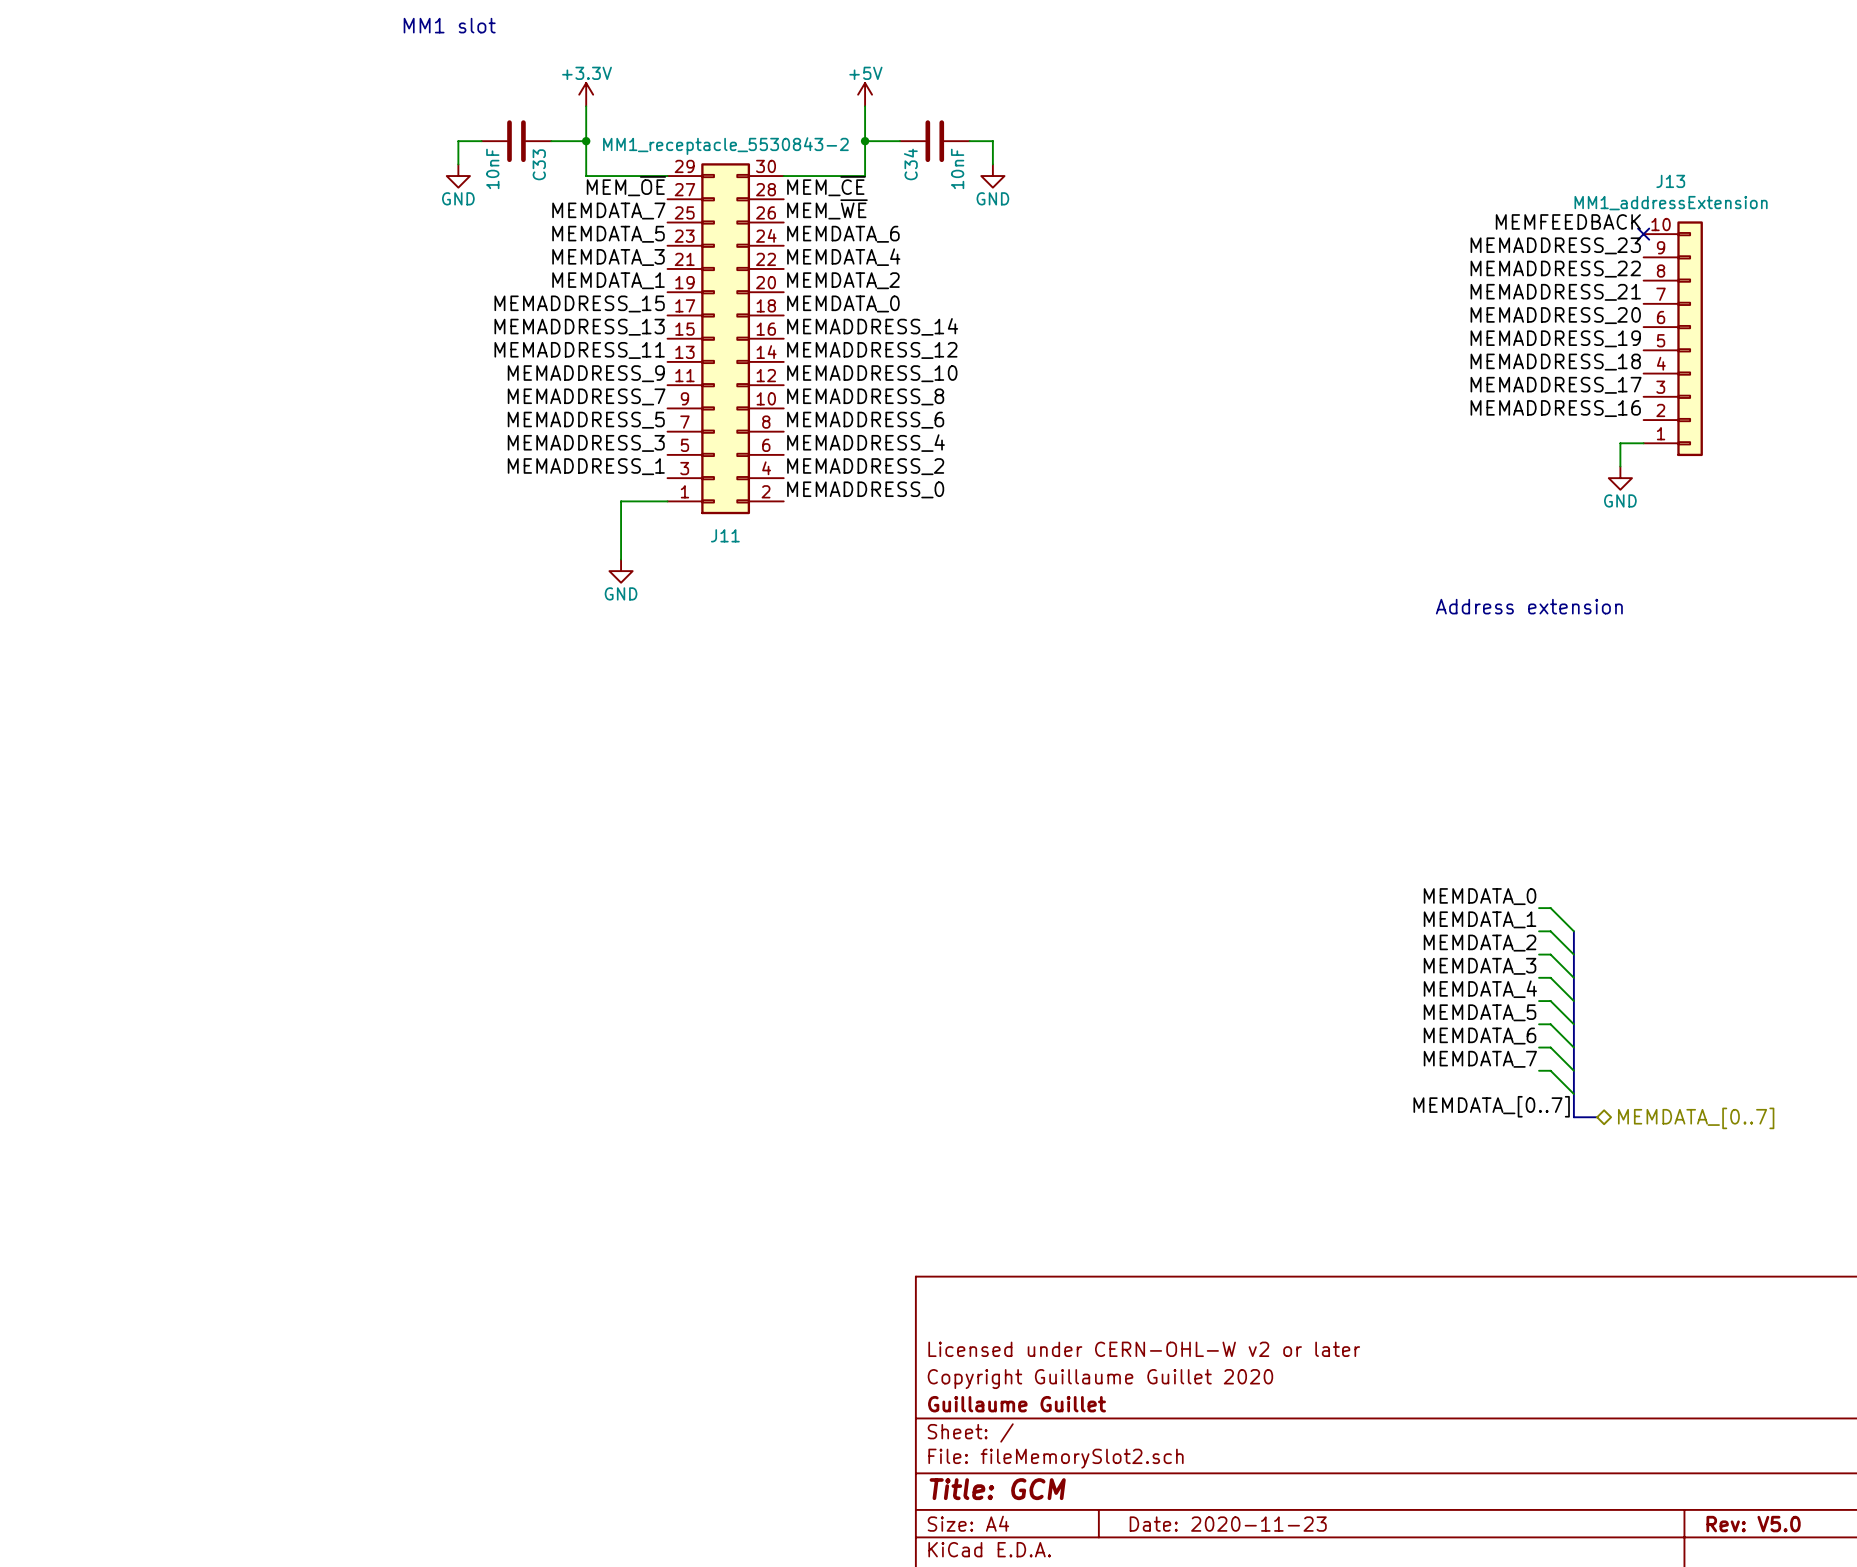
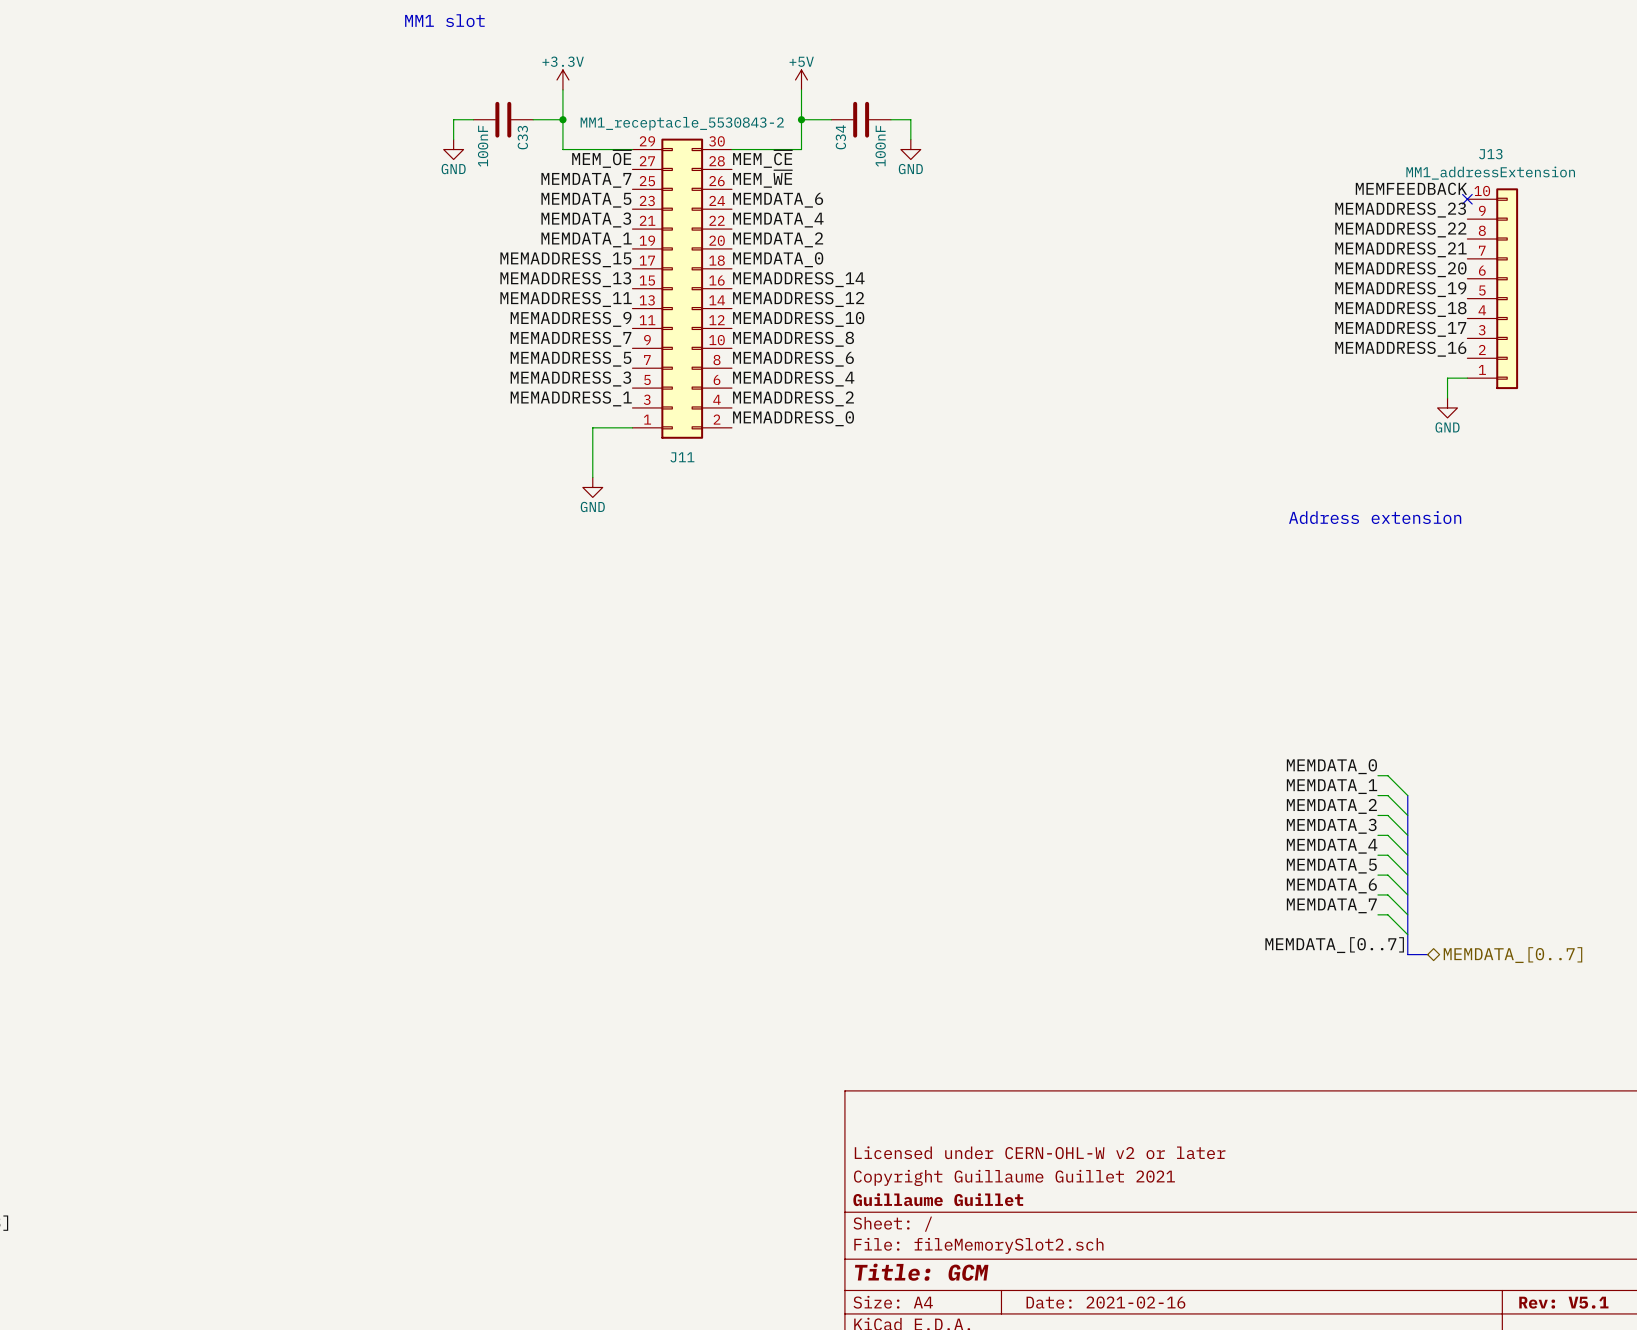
C33 value: 10nF (492, 168) -> 100nF (483, 146)
C34 value: 10nF (957, 168) -> 100nF (880, 146)
title block: Copyright Guillaume Guillet 2020 (1100, 1379) -> Copyright Guillaume Guillet 2021 (1014, 1177)
title block: Date: 2020-11-23 (1228, 1524) -> Date: 2021-02-16 (1105, 1302)
title block: Rev: V5.0 (1753, 1524) -> Rev: V5.1 (1563, 1302)

